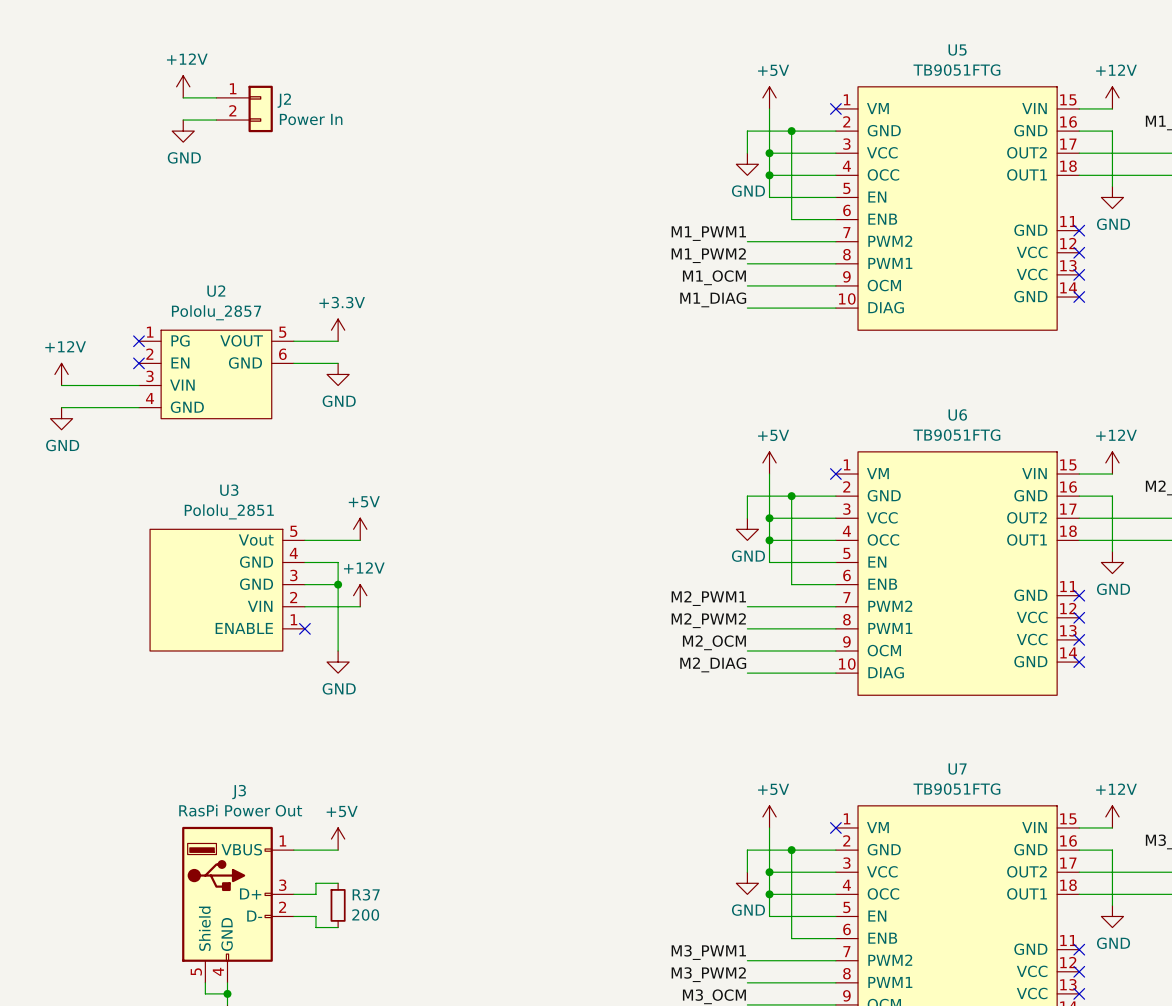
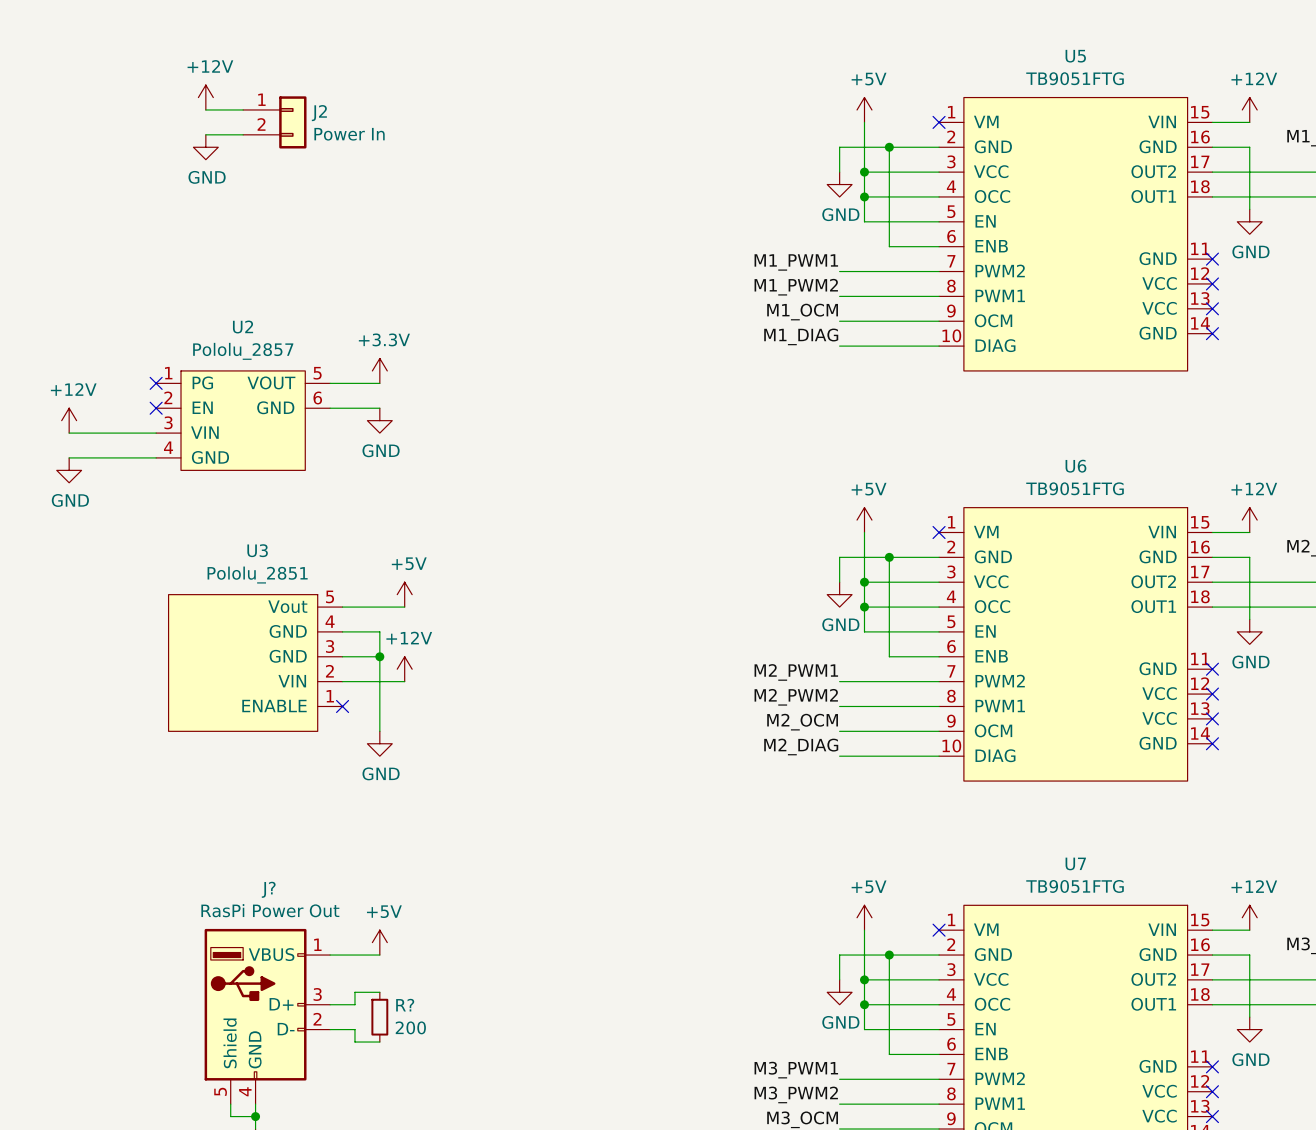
J3 name: J3 (239, 792) -> J? (268, 889)
R37 name: R37 (366, 894) -> R? (405, 1005)

